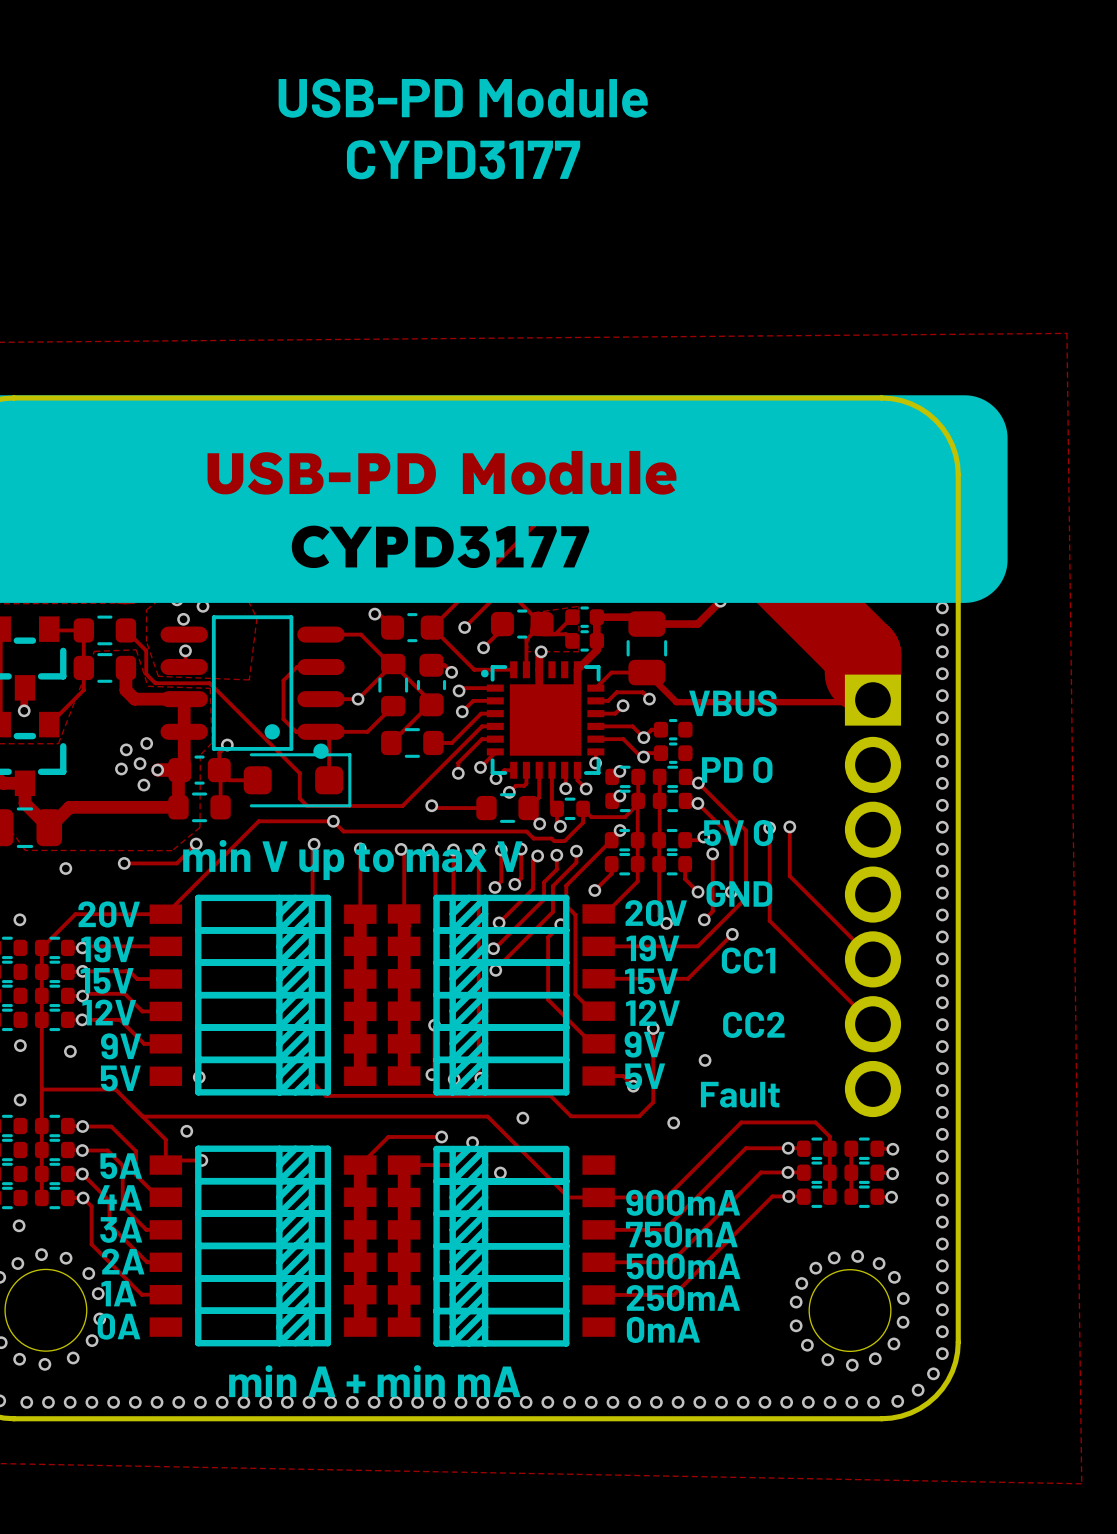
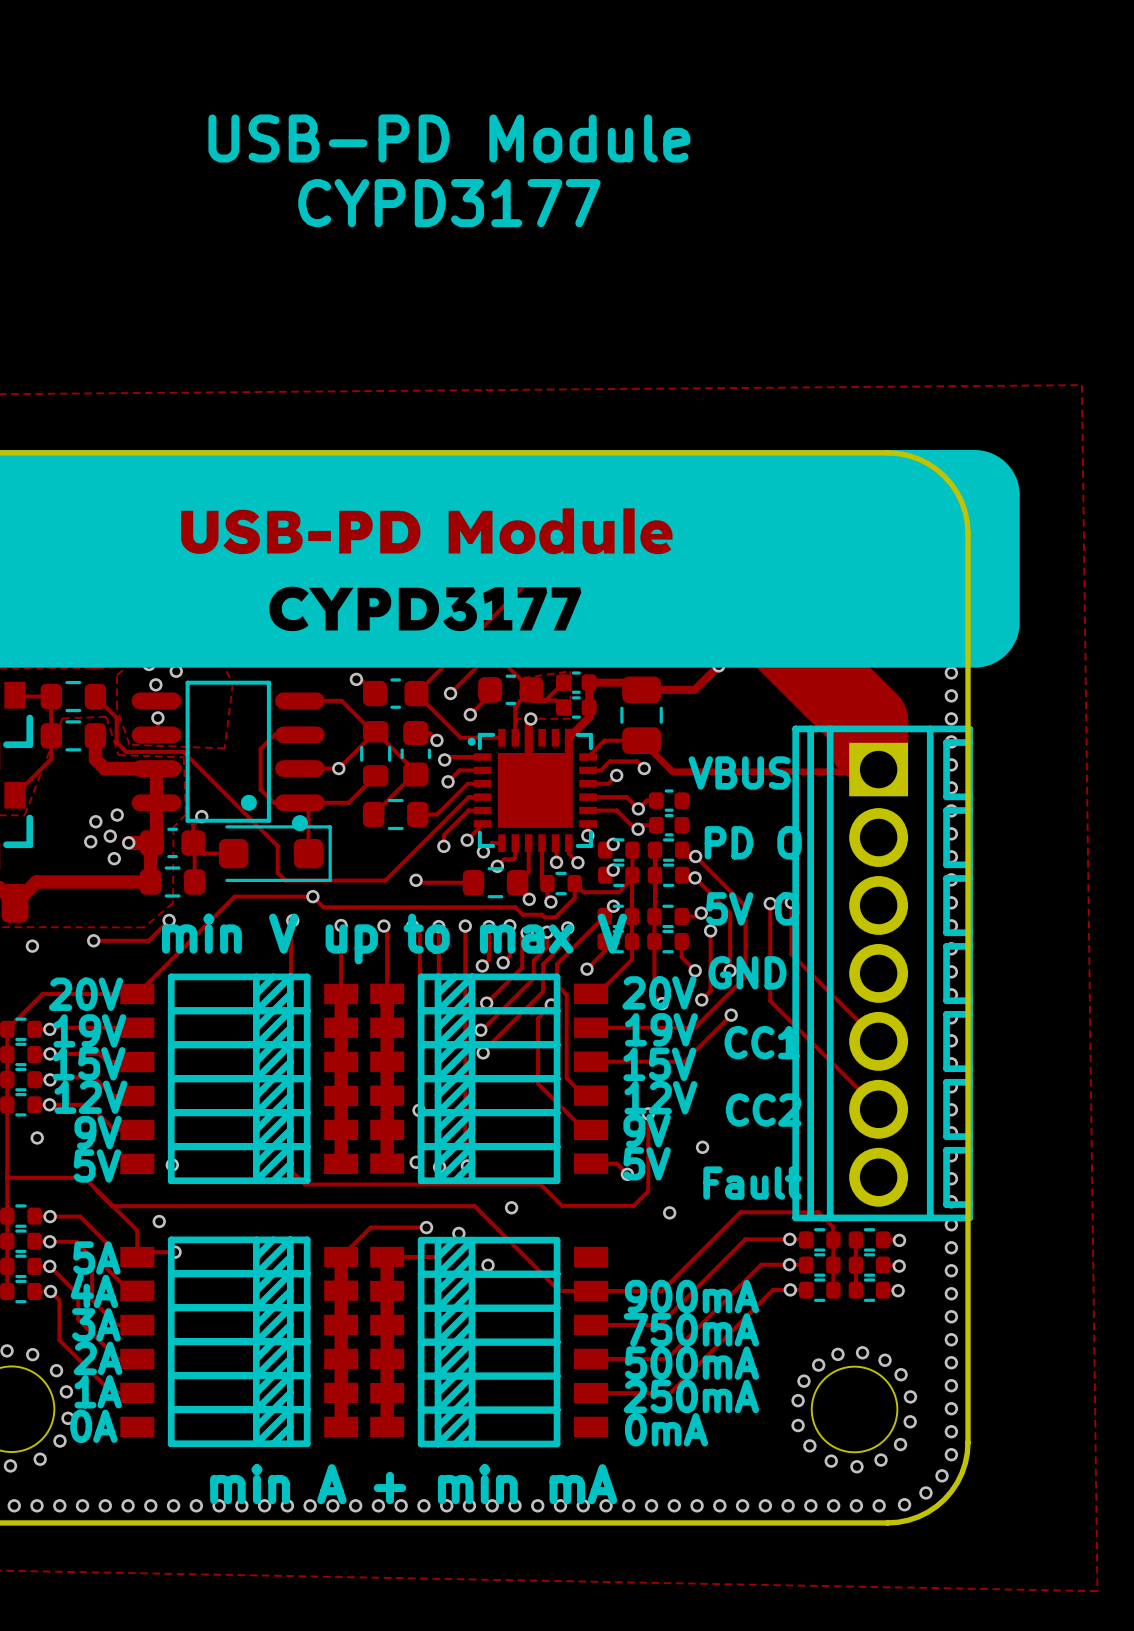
part footprint: [844, 674, 902, 1118] -> [792, 725, 973, 1222]

